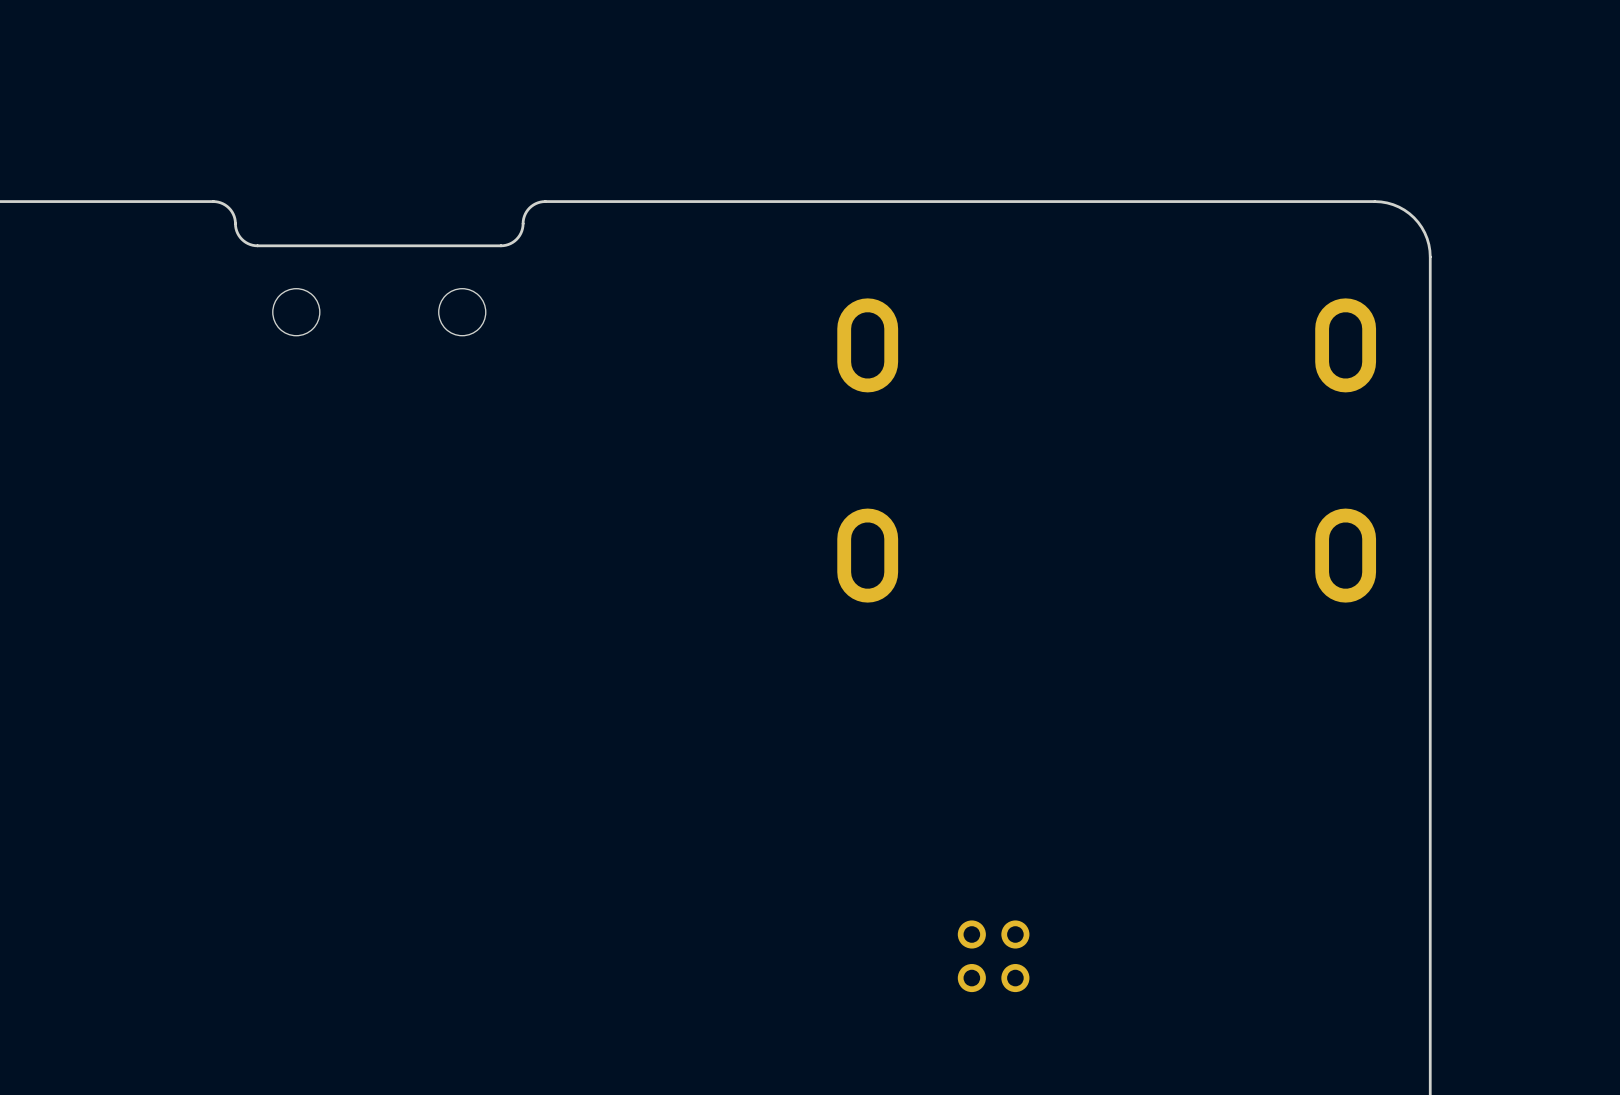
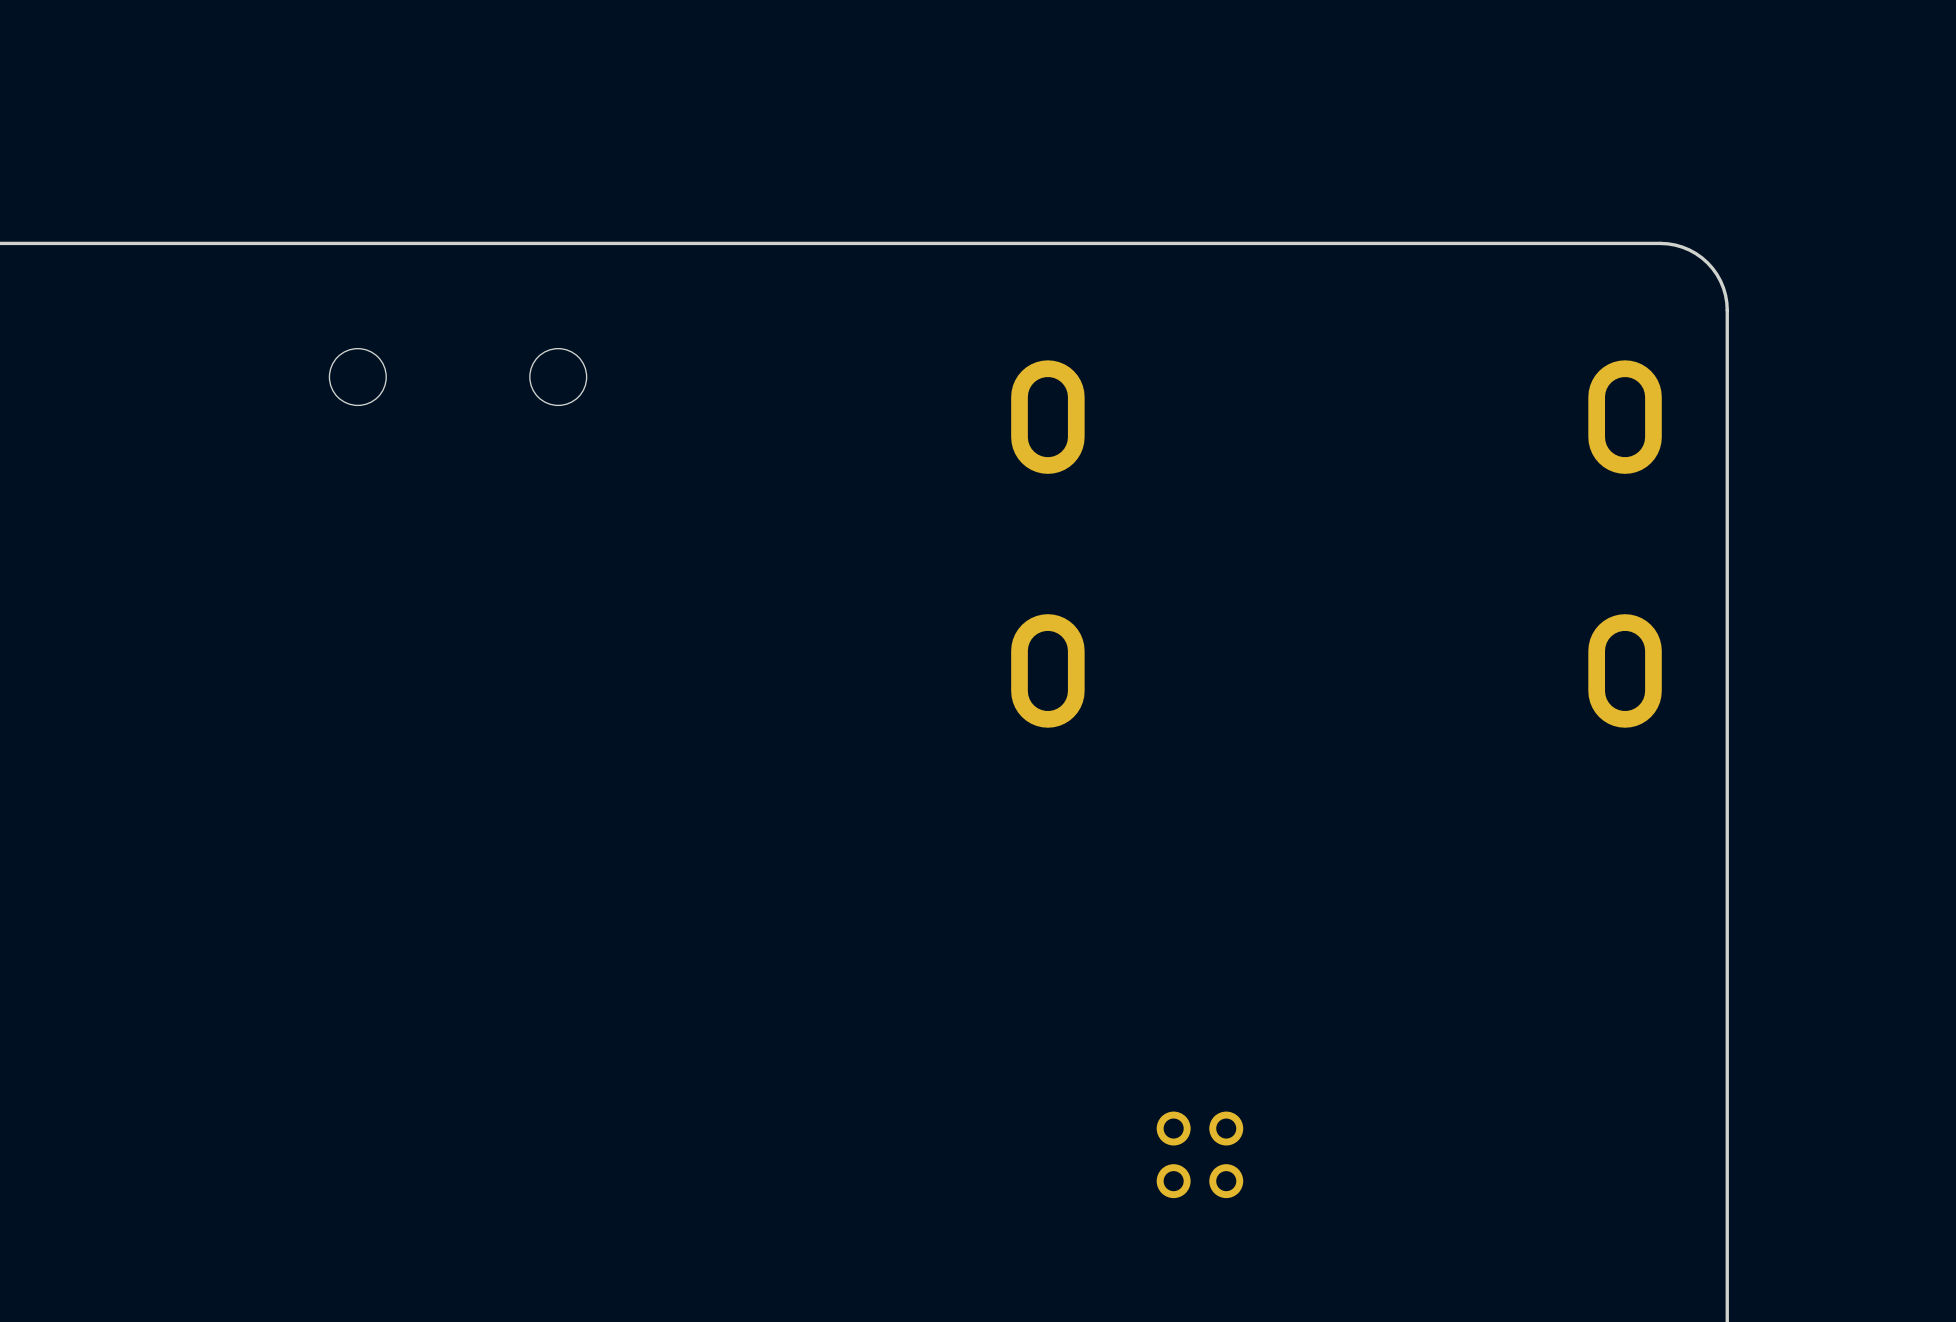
board edge: (545, 201) (535, 203) (527, 209) (523, 218) (521, 231) (516, 239) (508, 244) (500, 245) (255, 245) (245, 242) (238, 235) (234, 216) (228, 208) (222, 203) (213, 201) -> (658, 243) (257, 243)

